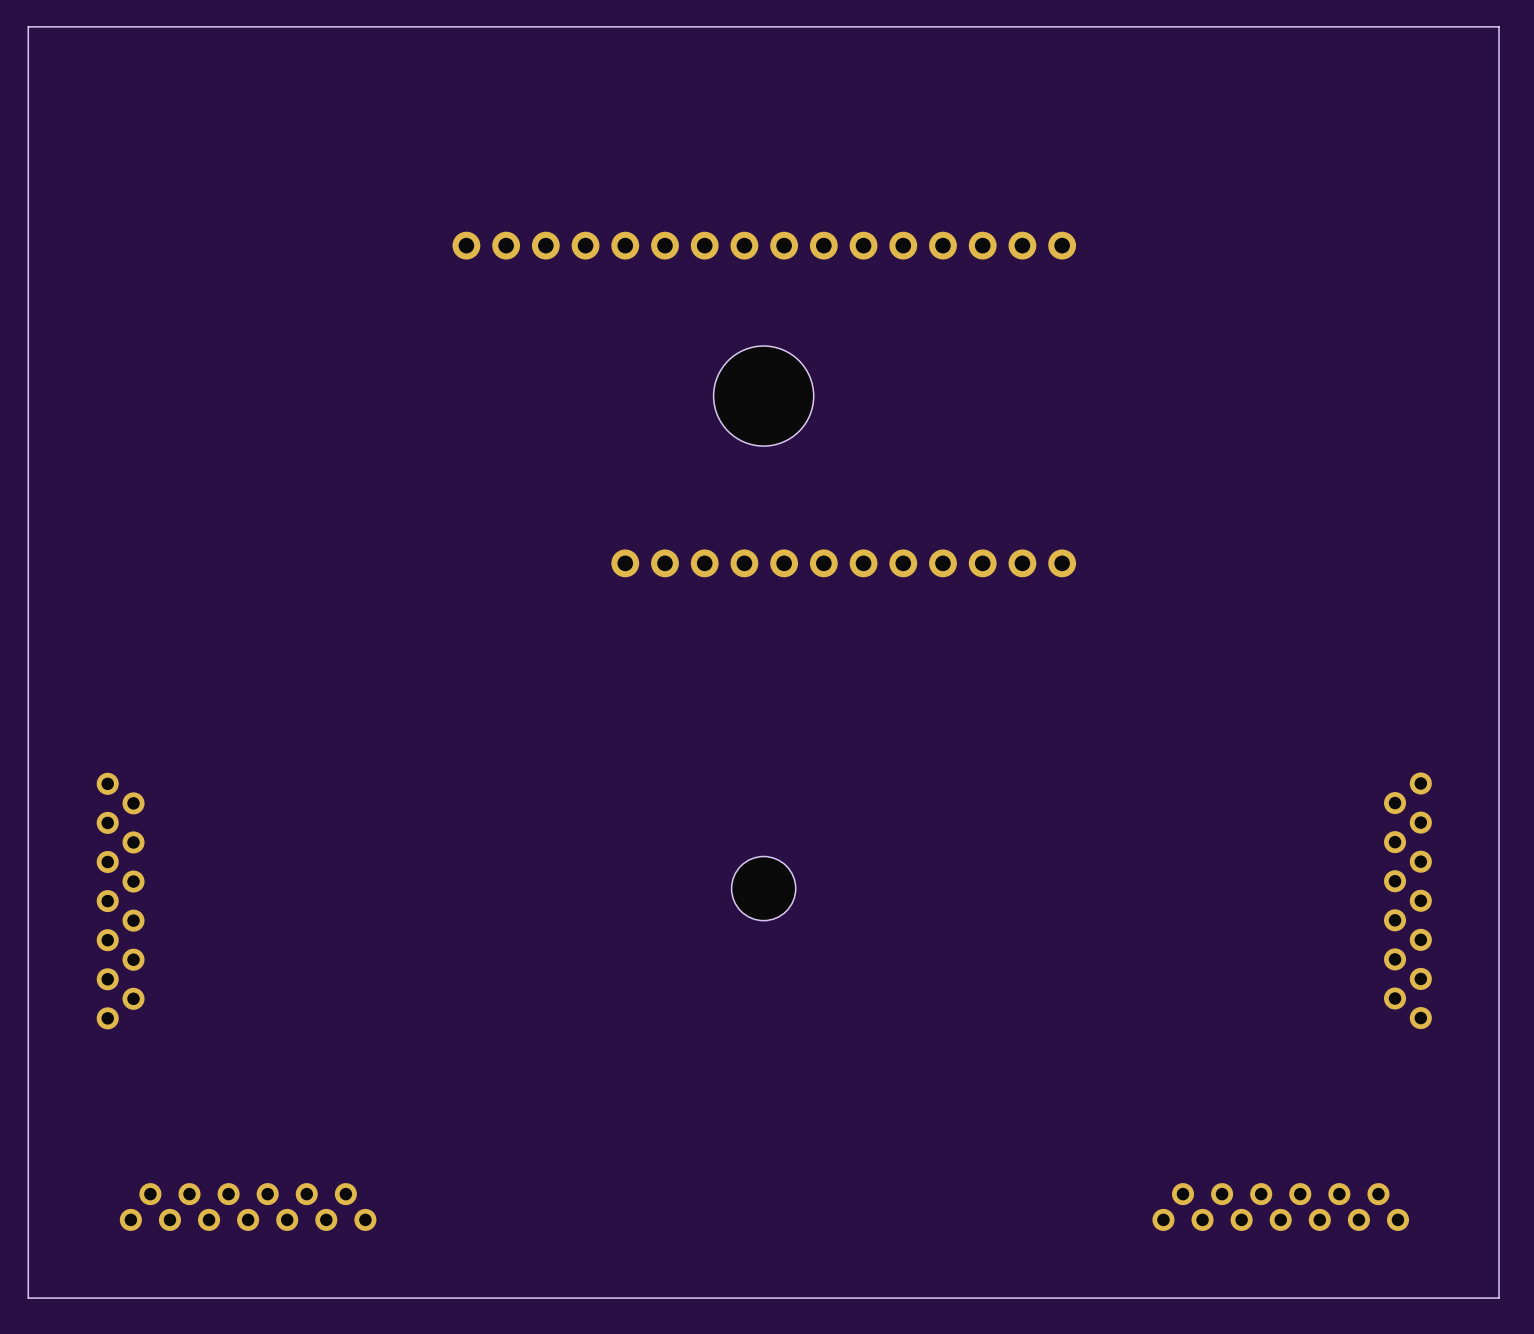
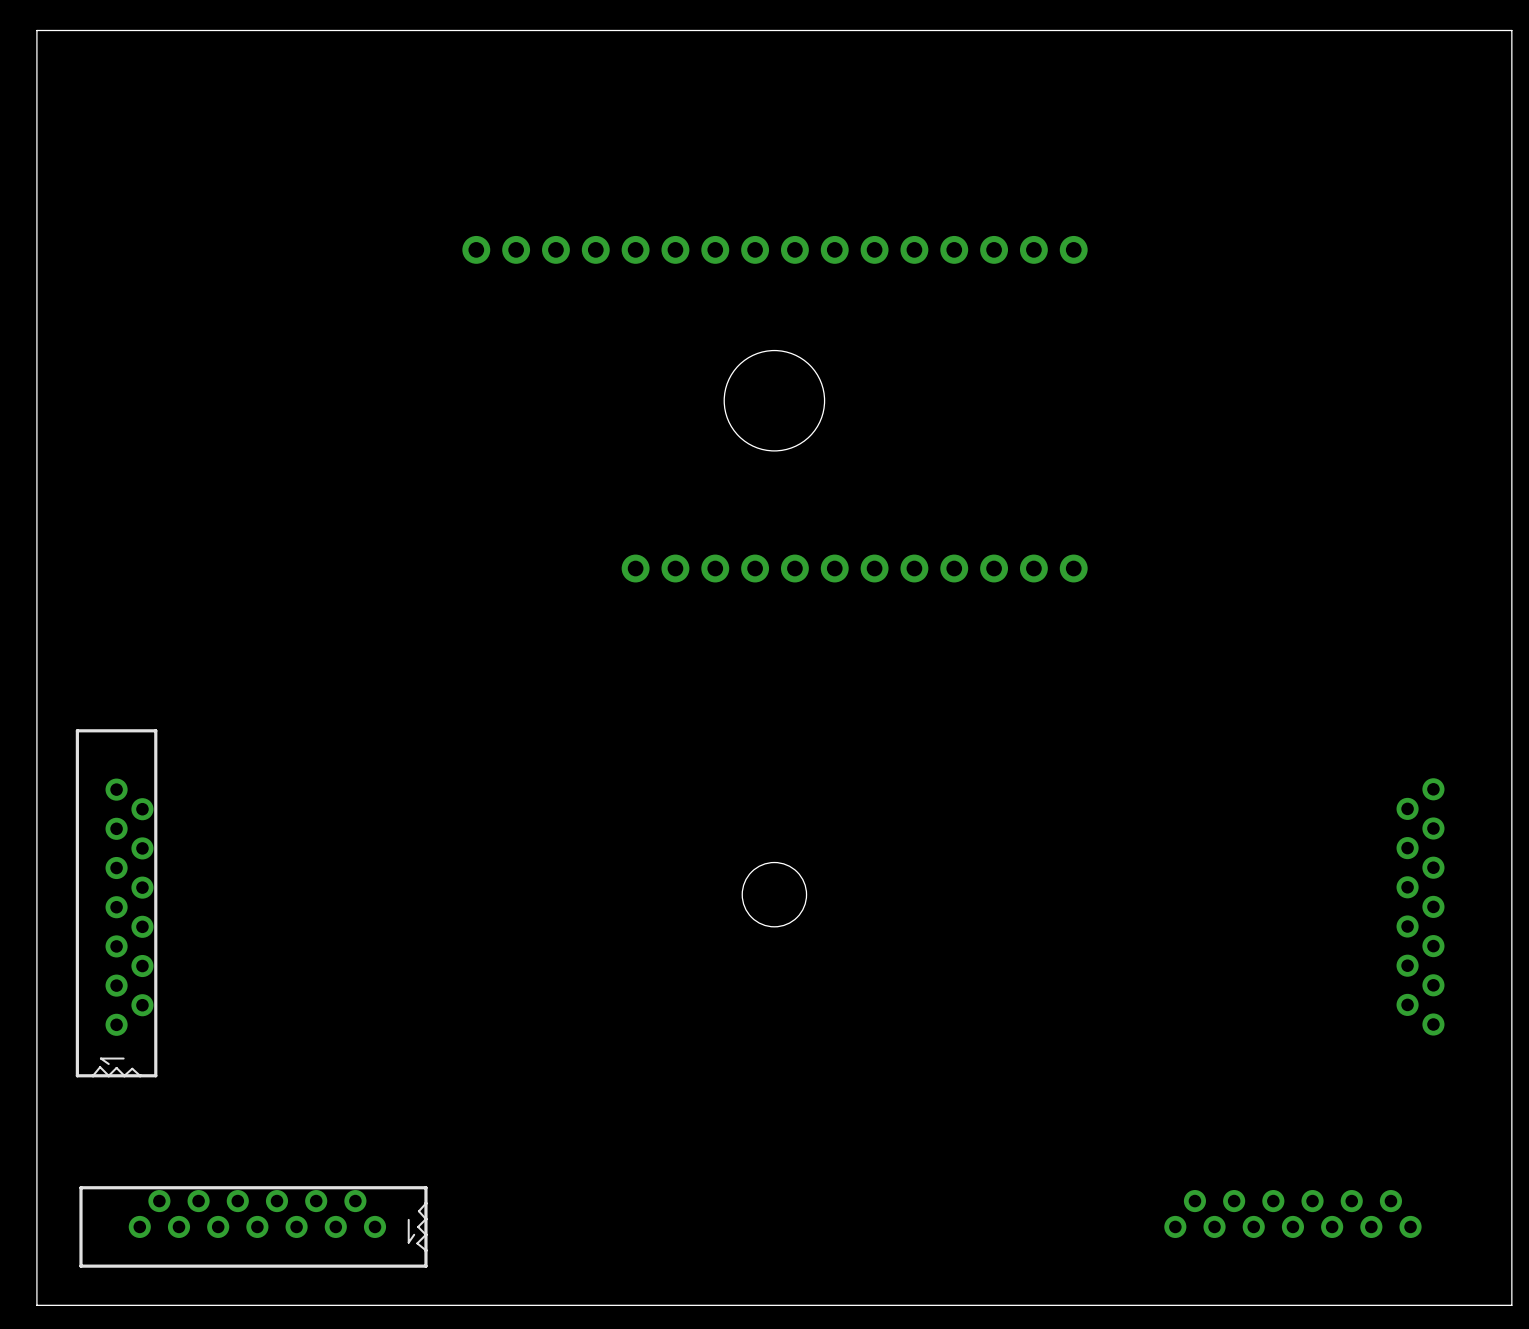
part footprint: [96, 772, 145, 1030] -> [75, 729, 158, 1078]
part footprint: [119, 1183, 377, 1231] -> [79, 1186, 428, 1268]

